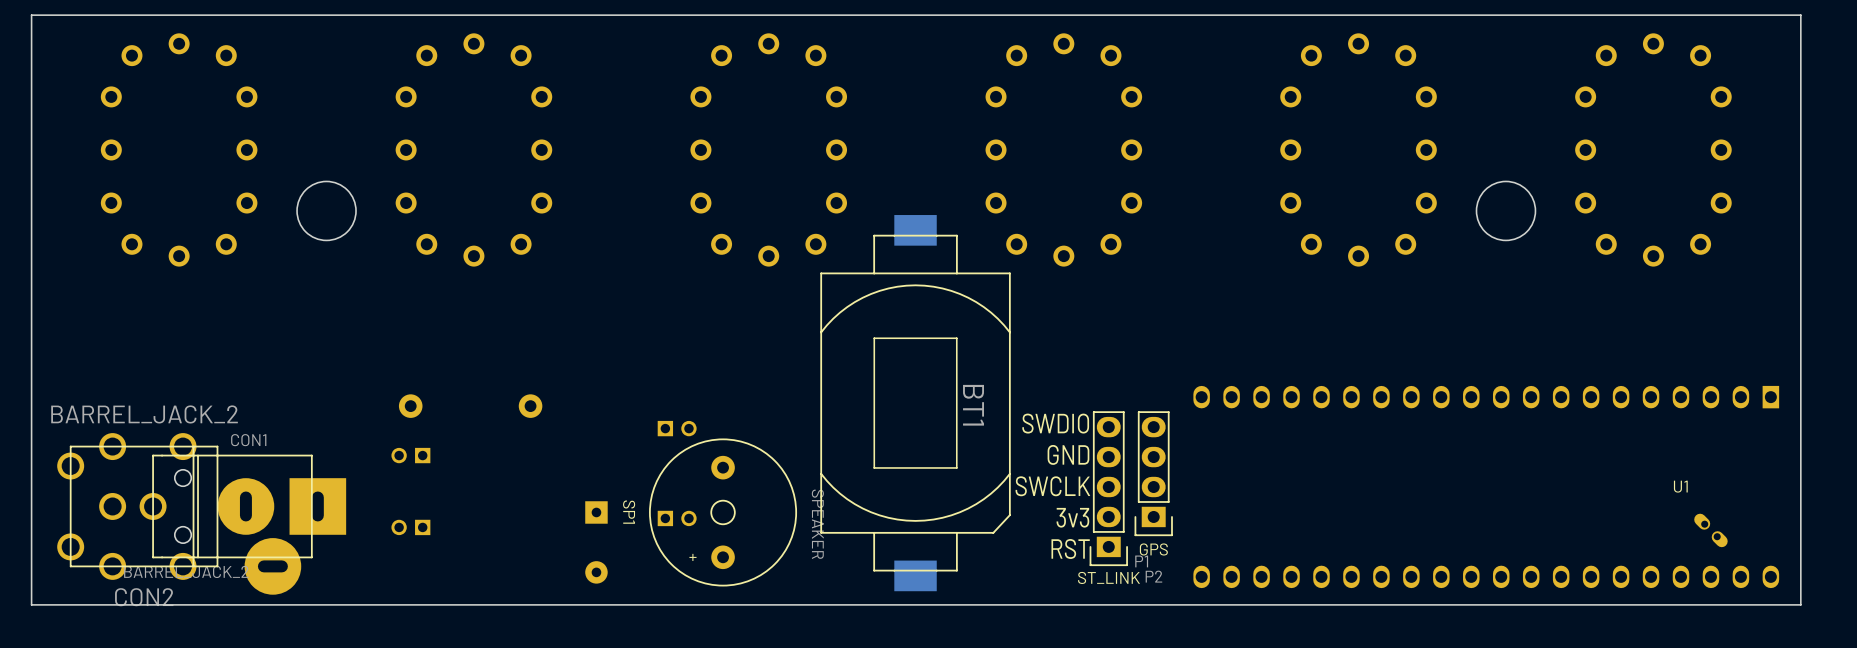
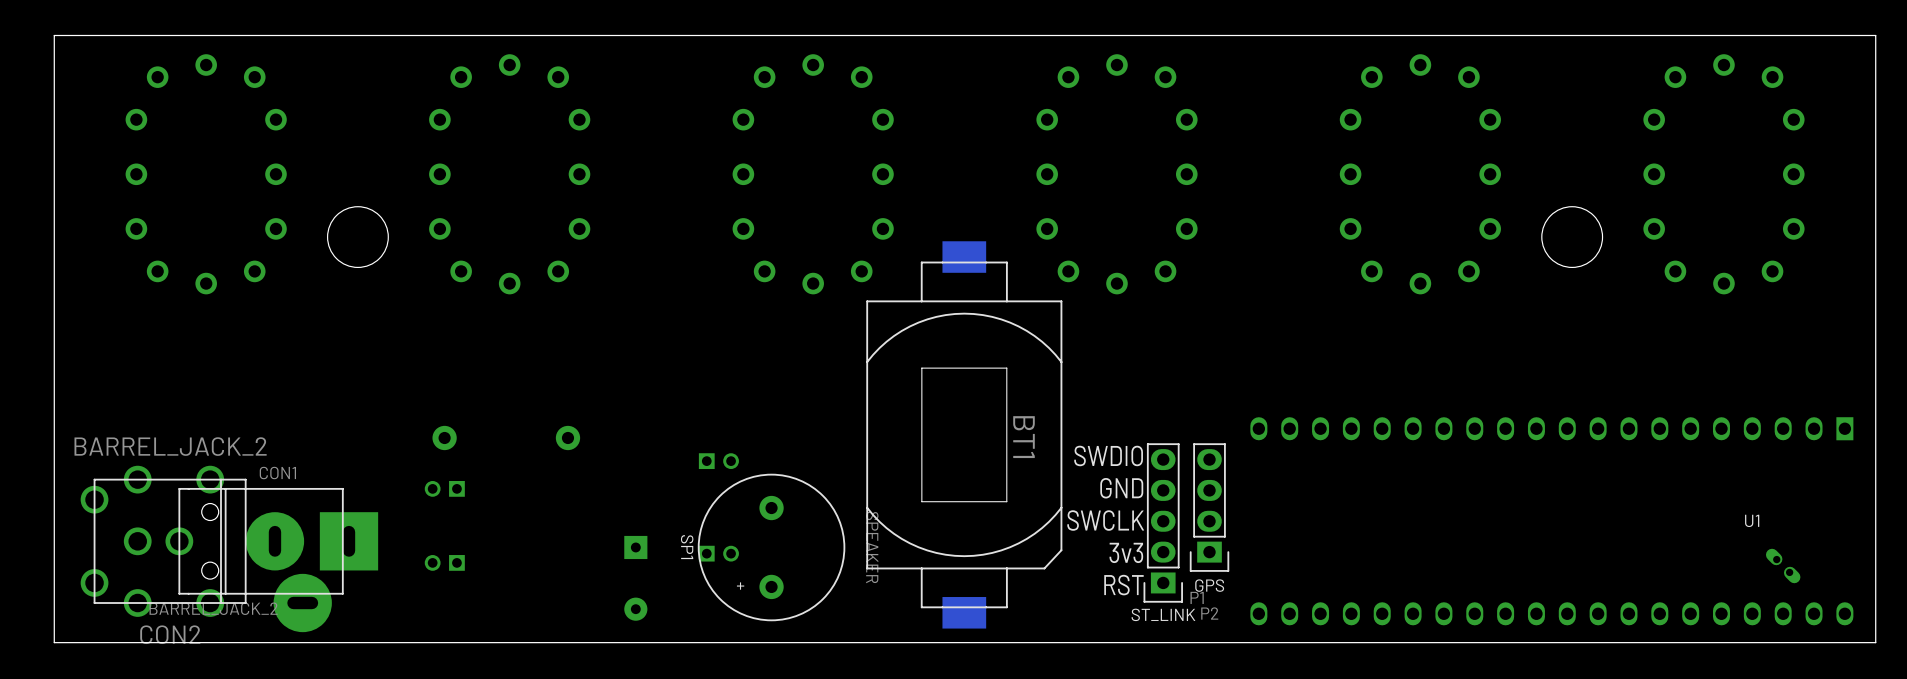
SP1 footprint: [649, 438, 798, 587] -> [697, 473, 846, 622]

